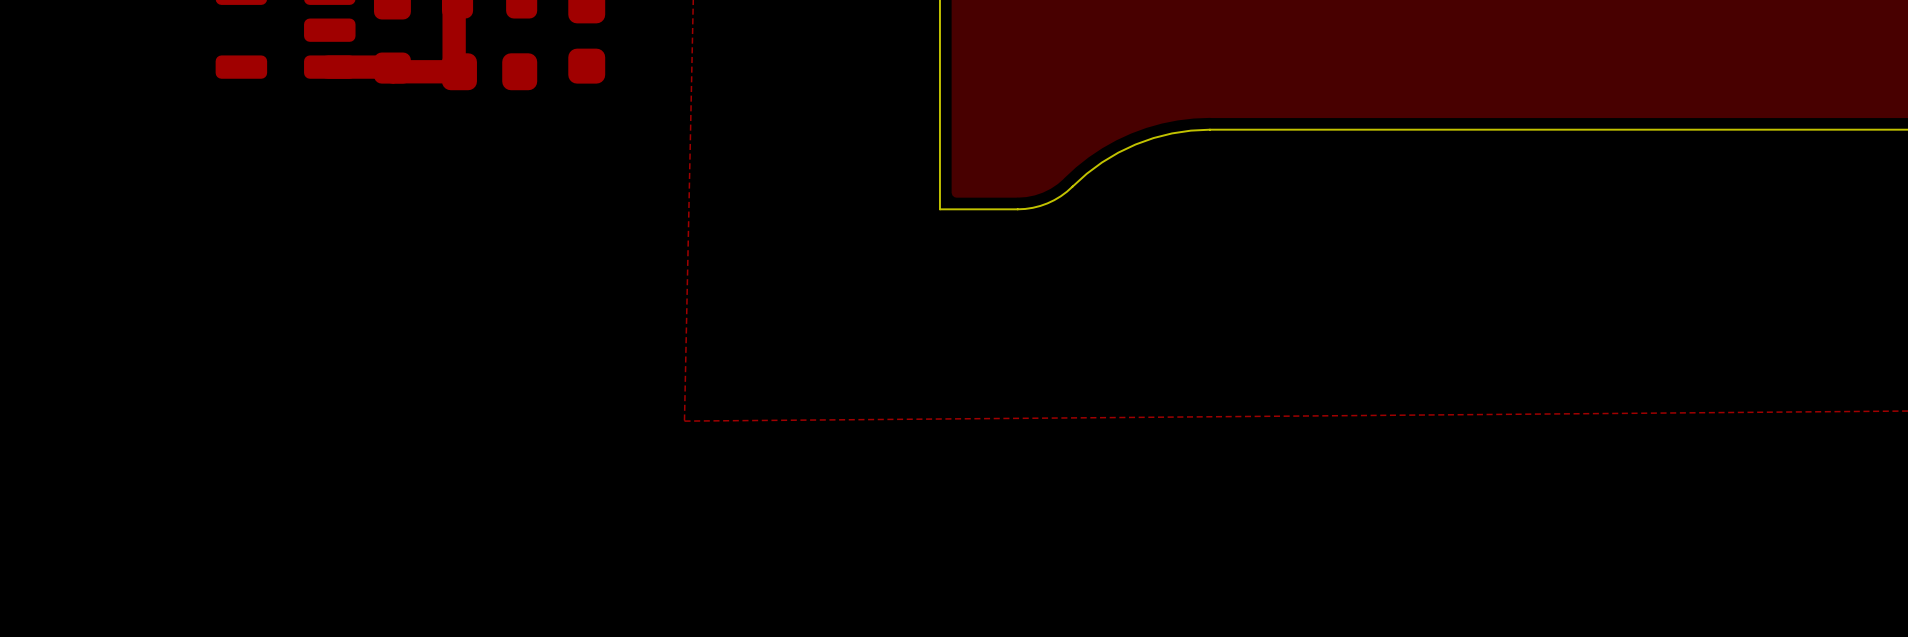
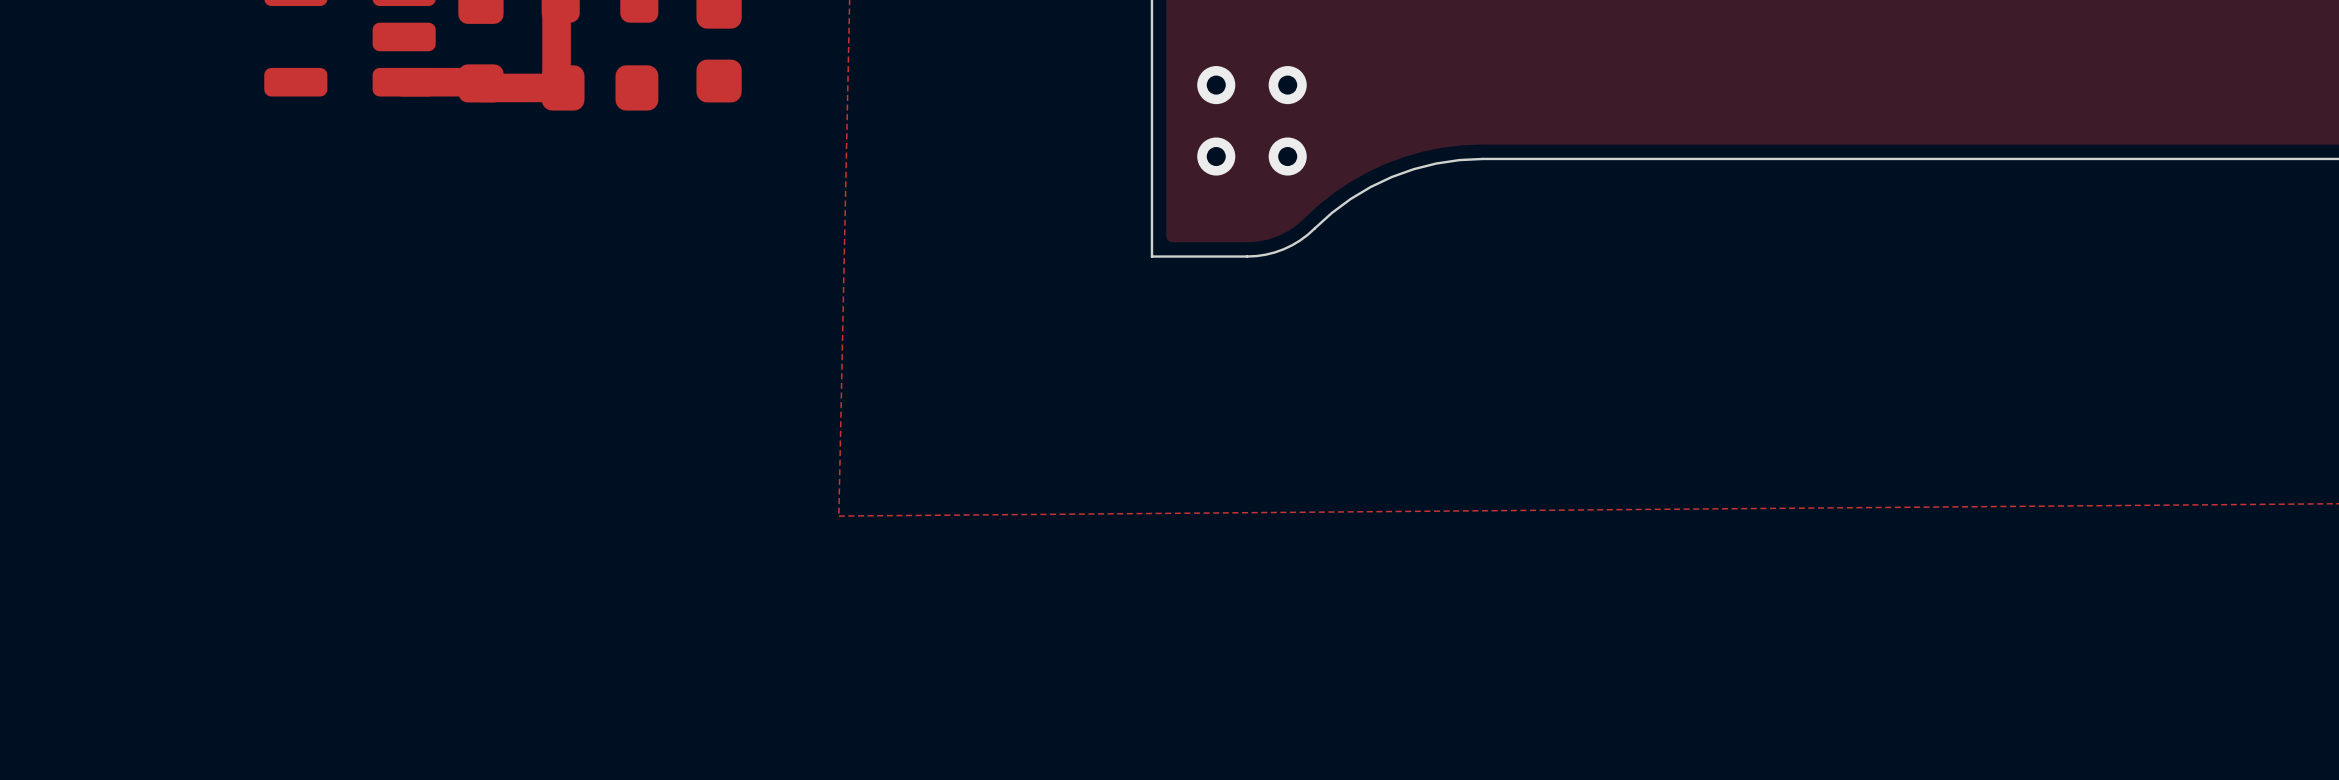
via: none -> (1216, 85)
via: none -> (1287, 85)
via: none -> (1216, 156)
via: none -> (1287, 156)

